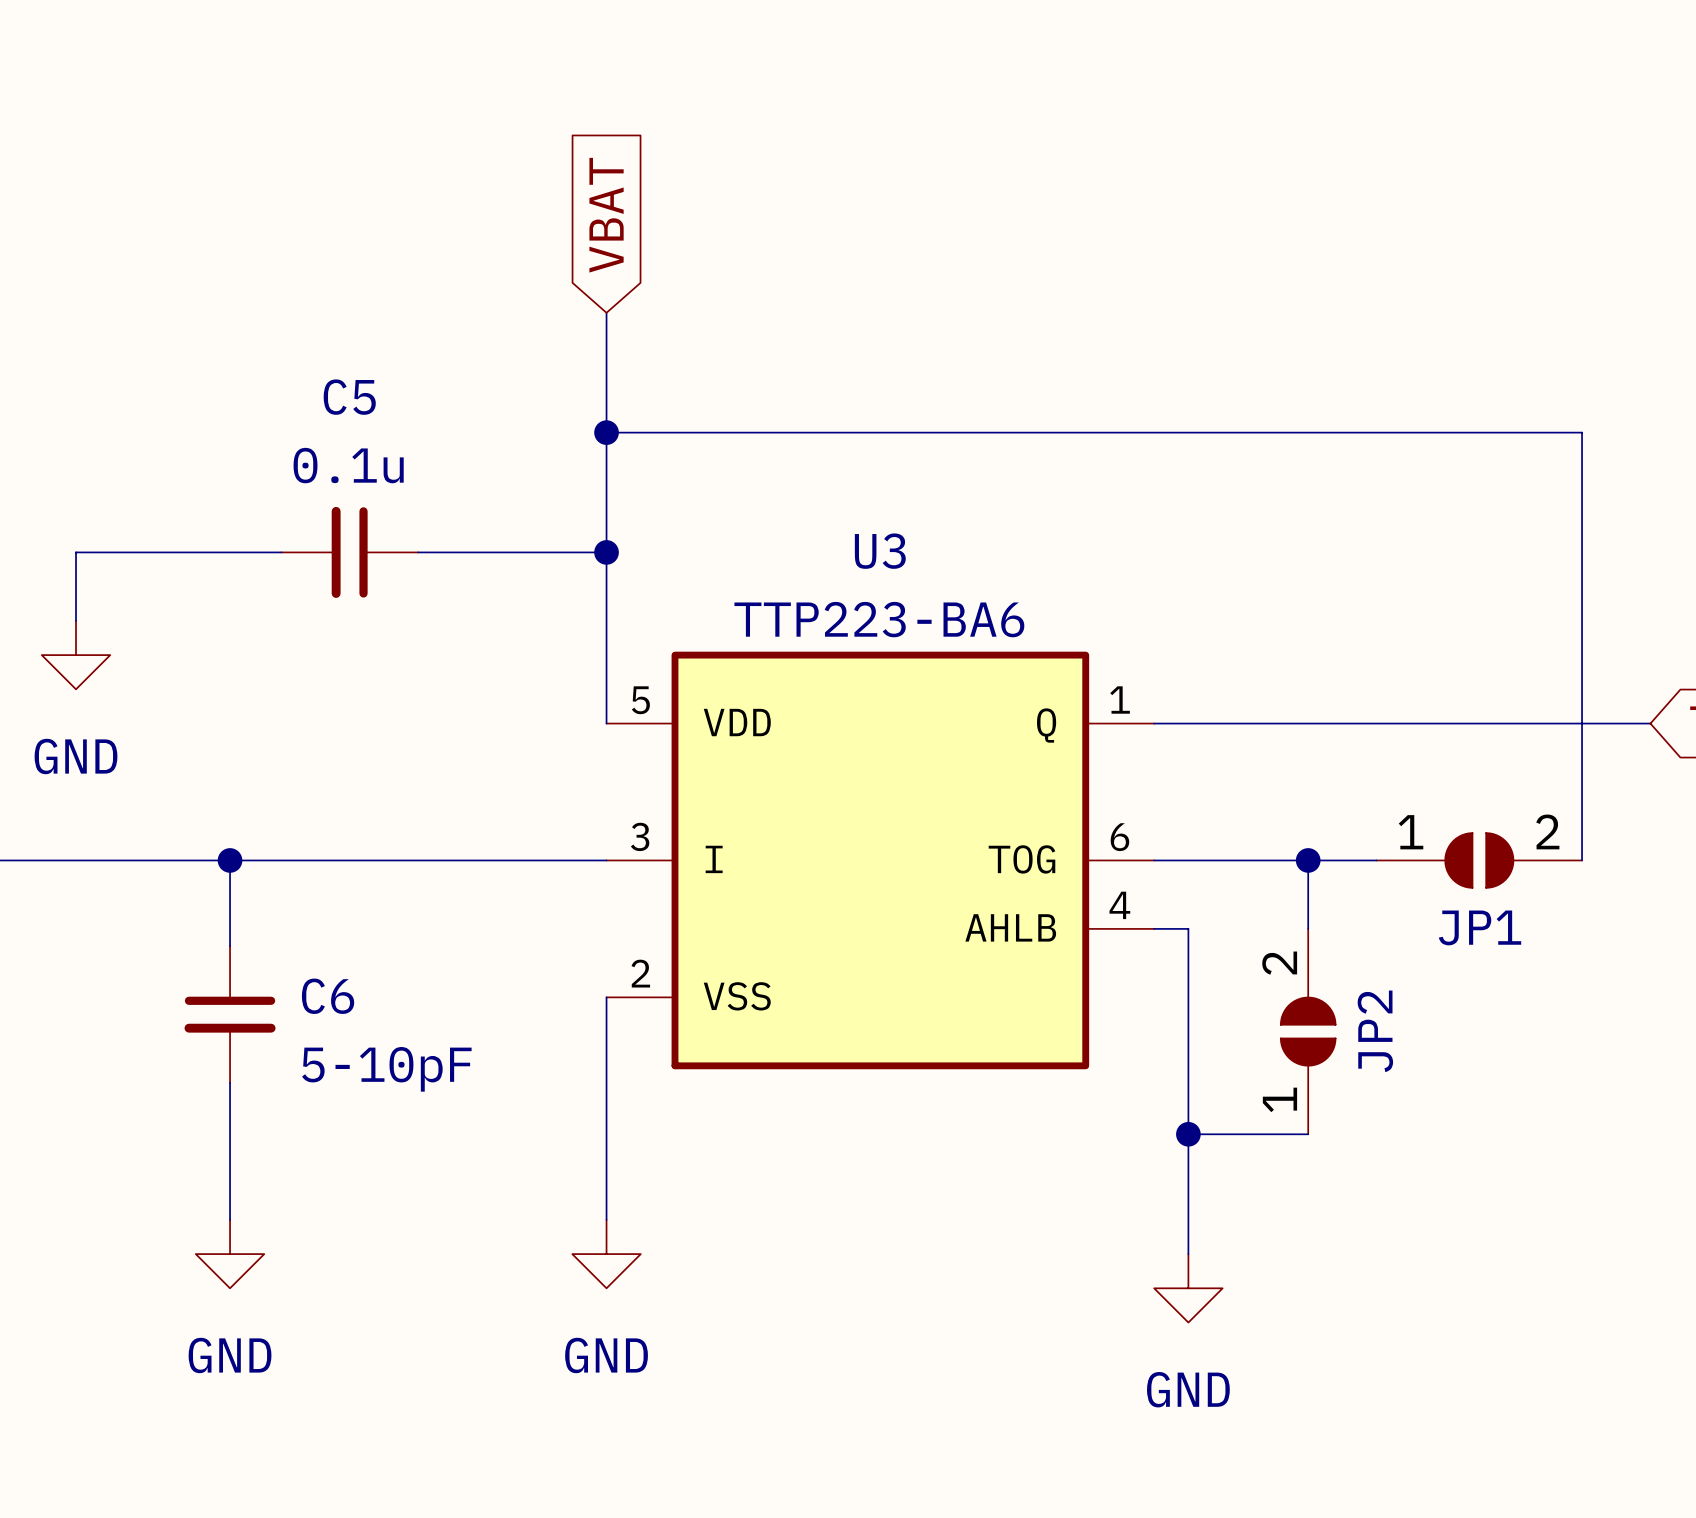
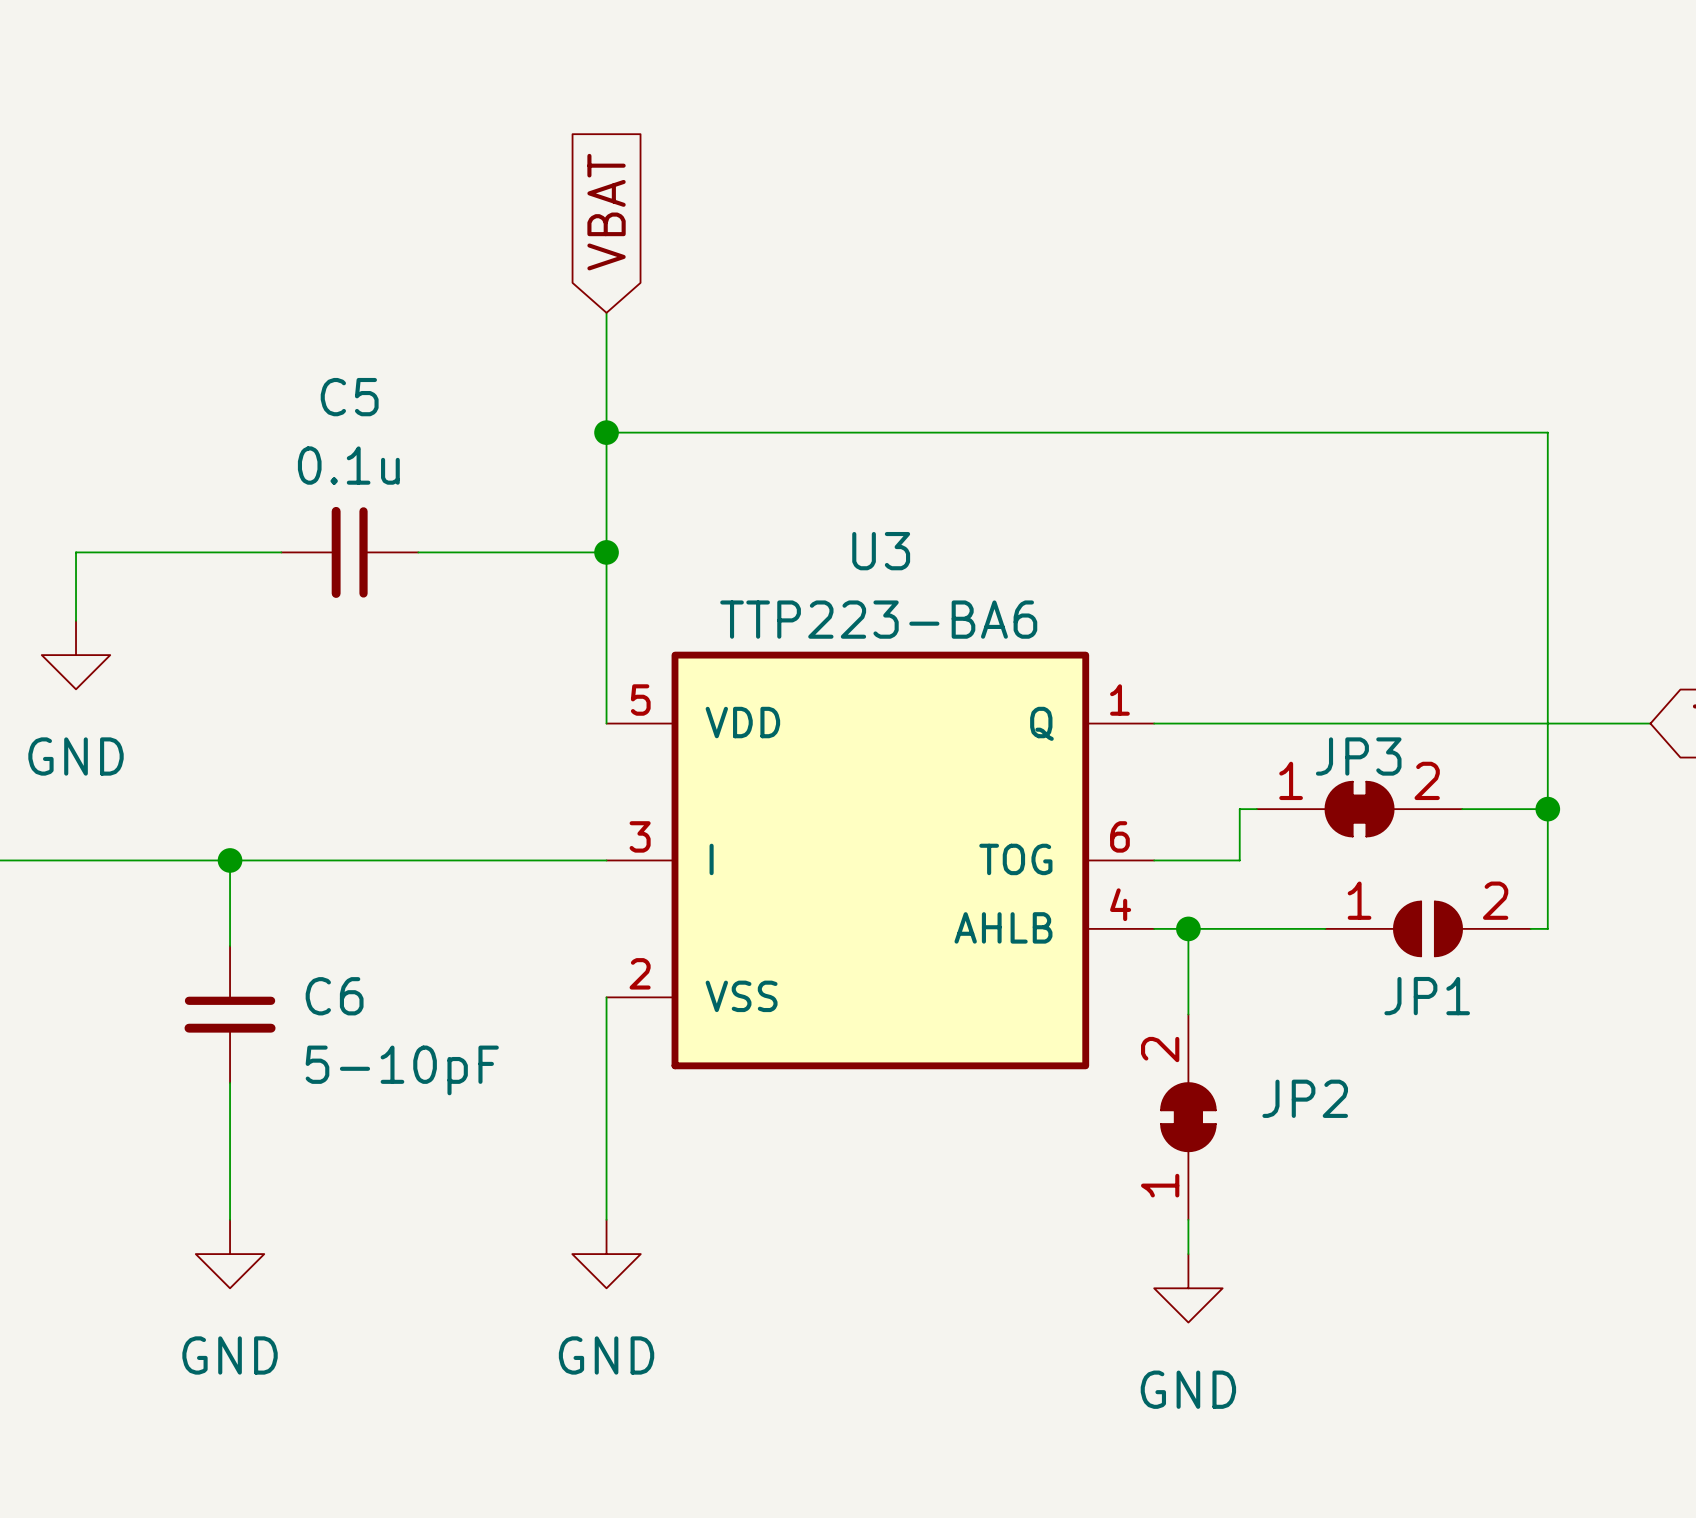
wire: (1547, 432) (1582, 432) (1582, 860) -> (1547, 432) (1547, 928) (1530, 928)
JP3: none -> (1359, 809)
wire: none -> (1462, 809) (1547, 809)
junction: none -> (1547, 809)
wire: (1239, 860) (1376, 860) -> (1239, 860) (1239, 809) (1256, 809)
wire: (1308, 860) (1308, 928) -> none
junction: (1308, 860) -> none
JP1 position: (1479, 860) -> (1428, 928)
wire: none -> (1188, 928) (1325, 928)
junction: none -> (1188, 928)
JP2 symbol: [1280, 928, 1336, 1135] -> [1161, 1014, 1216, 1220]
JP2 name position: JP2 (1375, 1031) -> JP2 (1305, 1098)
wire: (1188, 1134) (1308, 1134) -> none
junction: (1188, 1134) -> none

